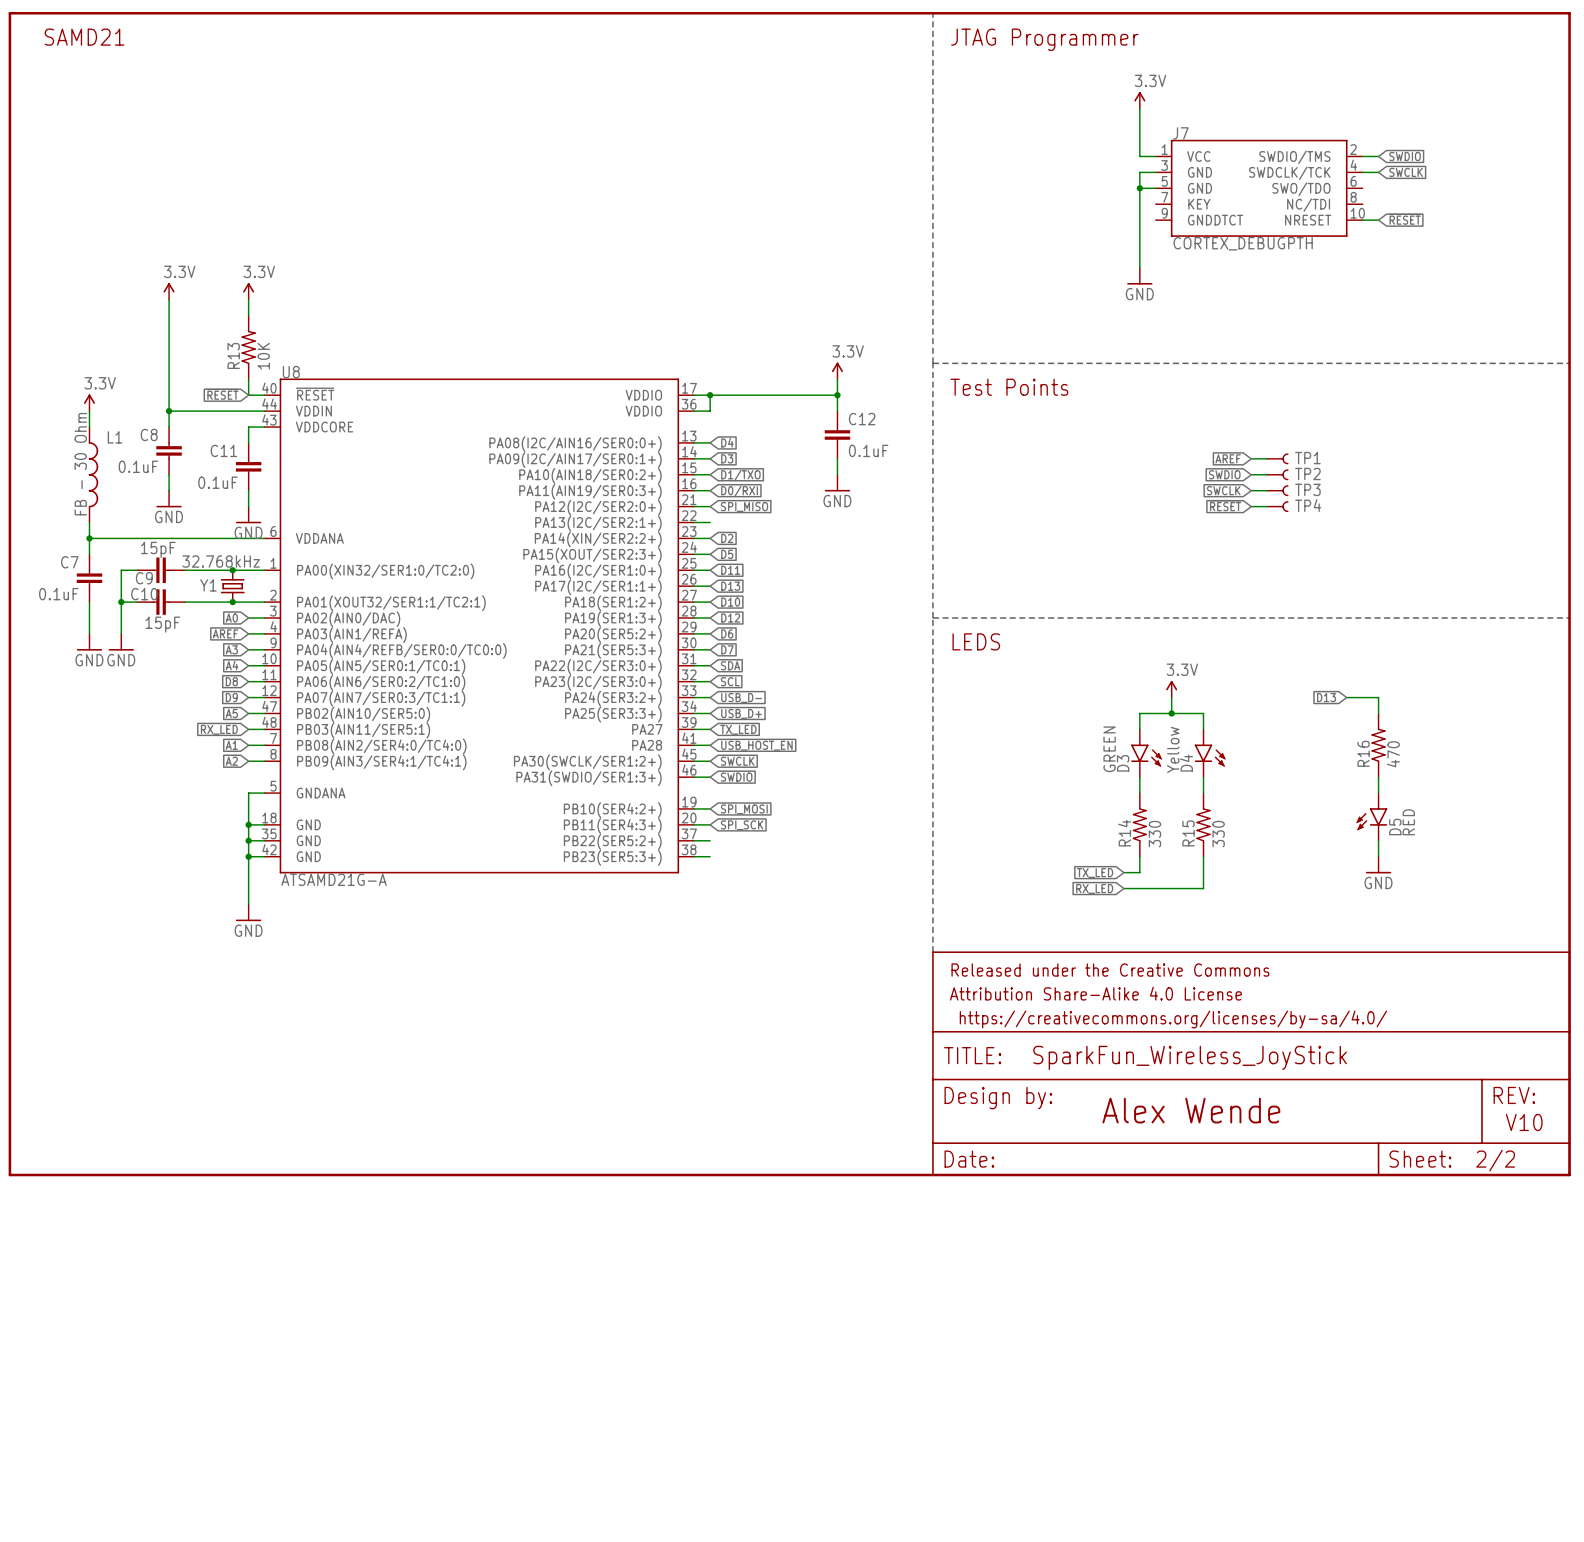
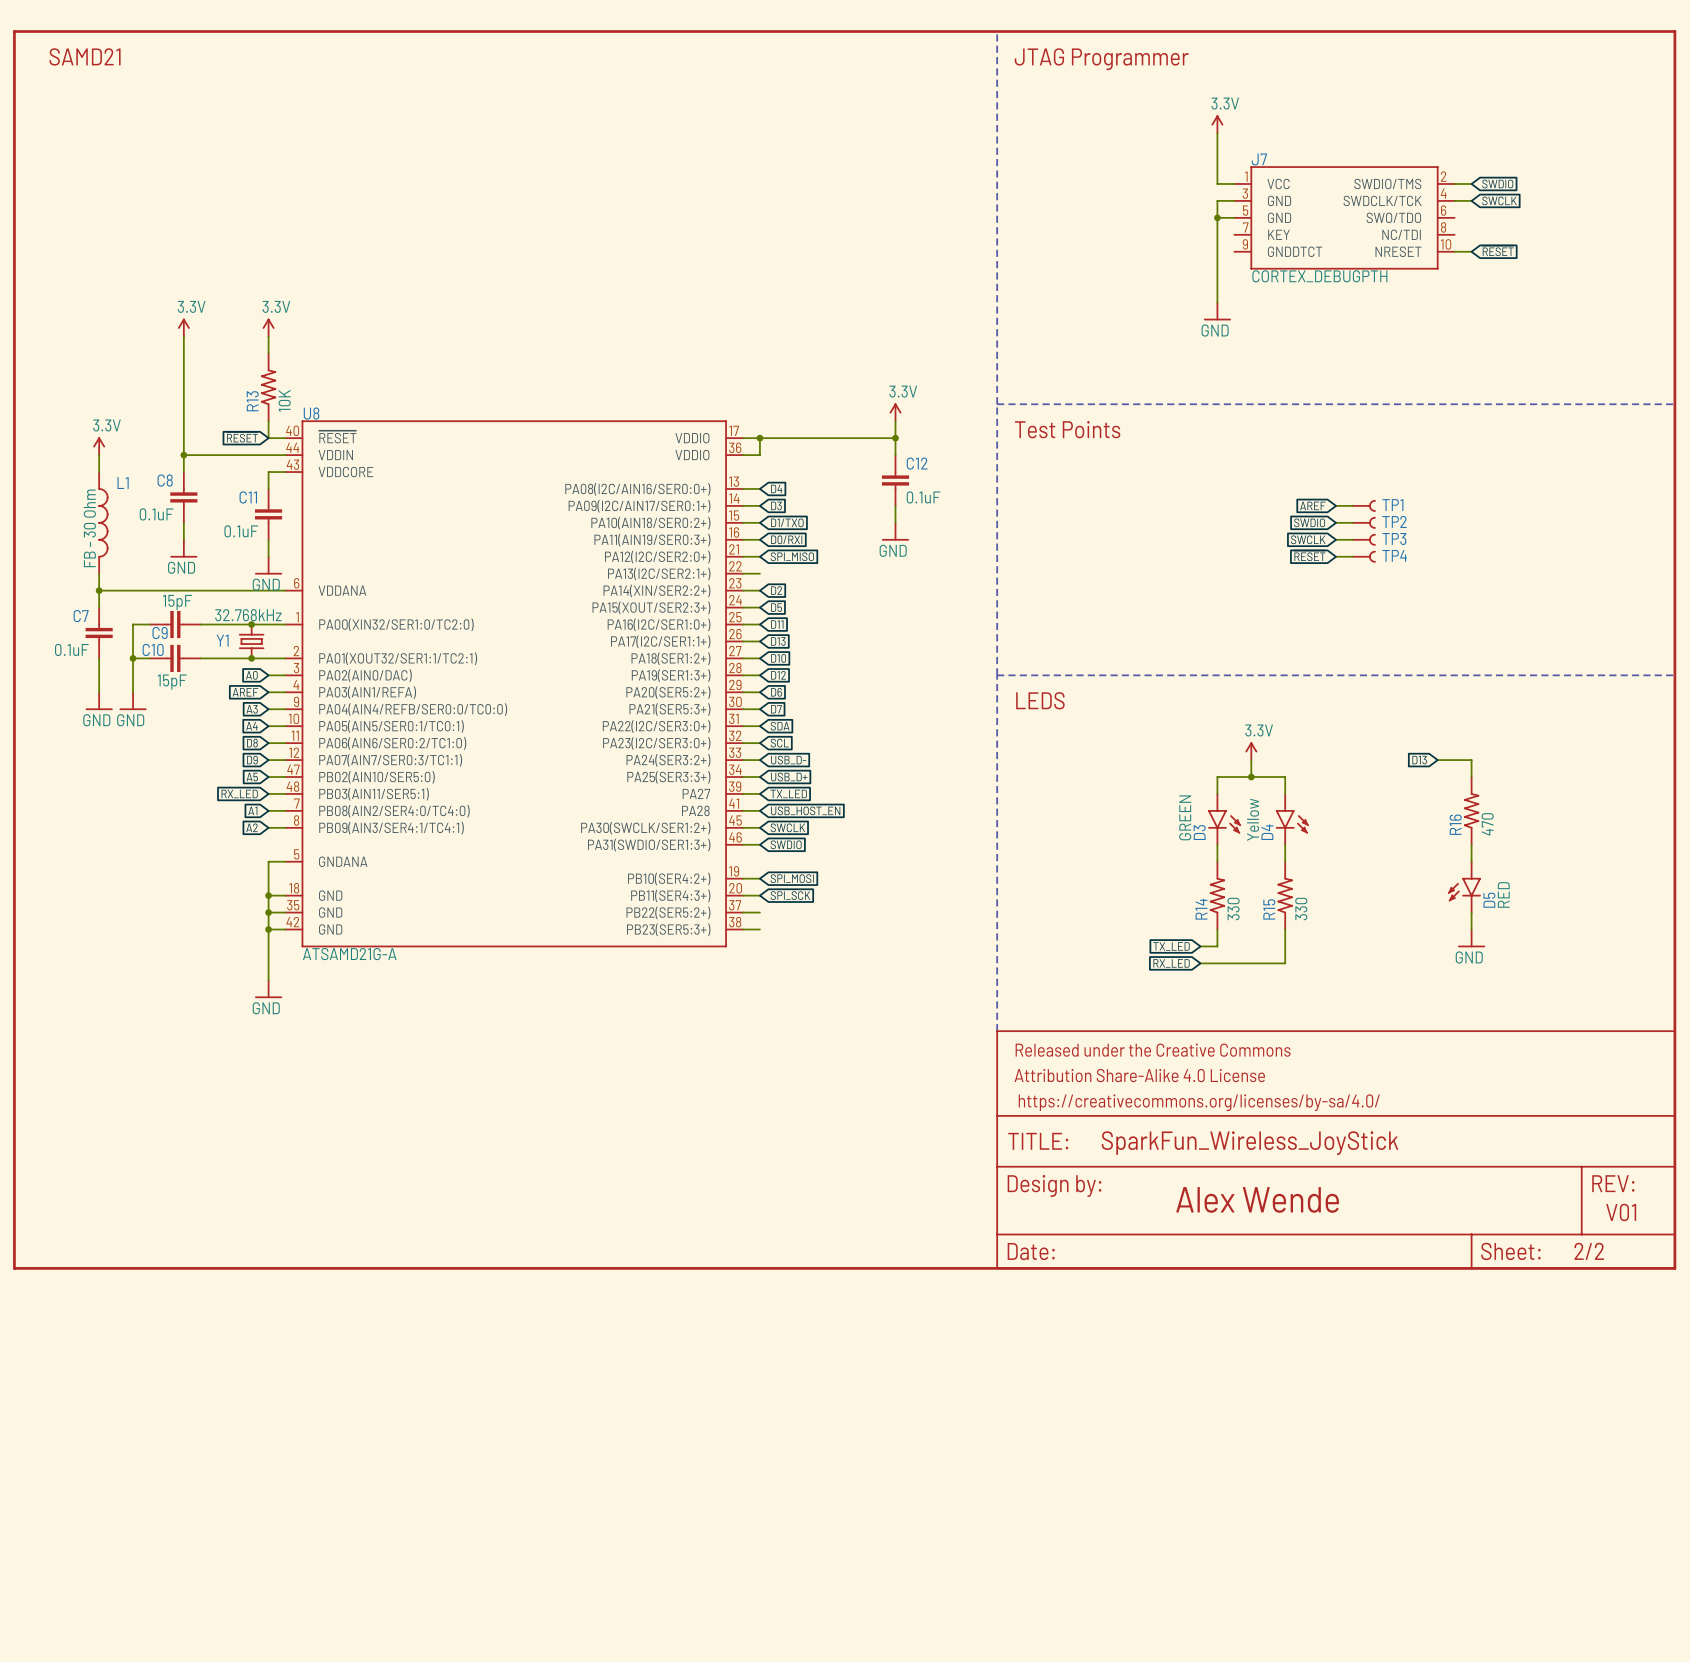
text: V10 (1524, 1122) -> V01 (1621, 1212)

